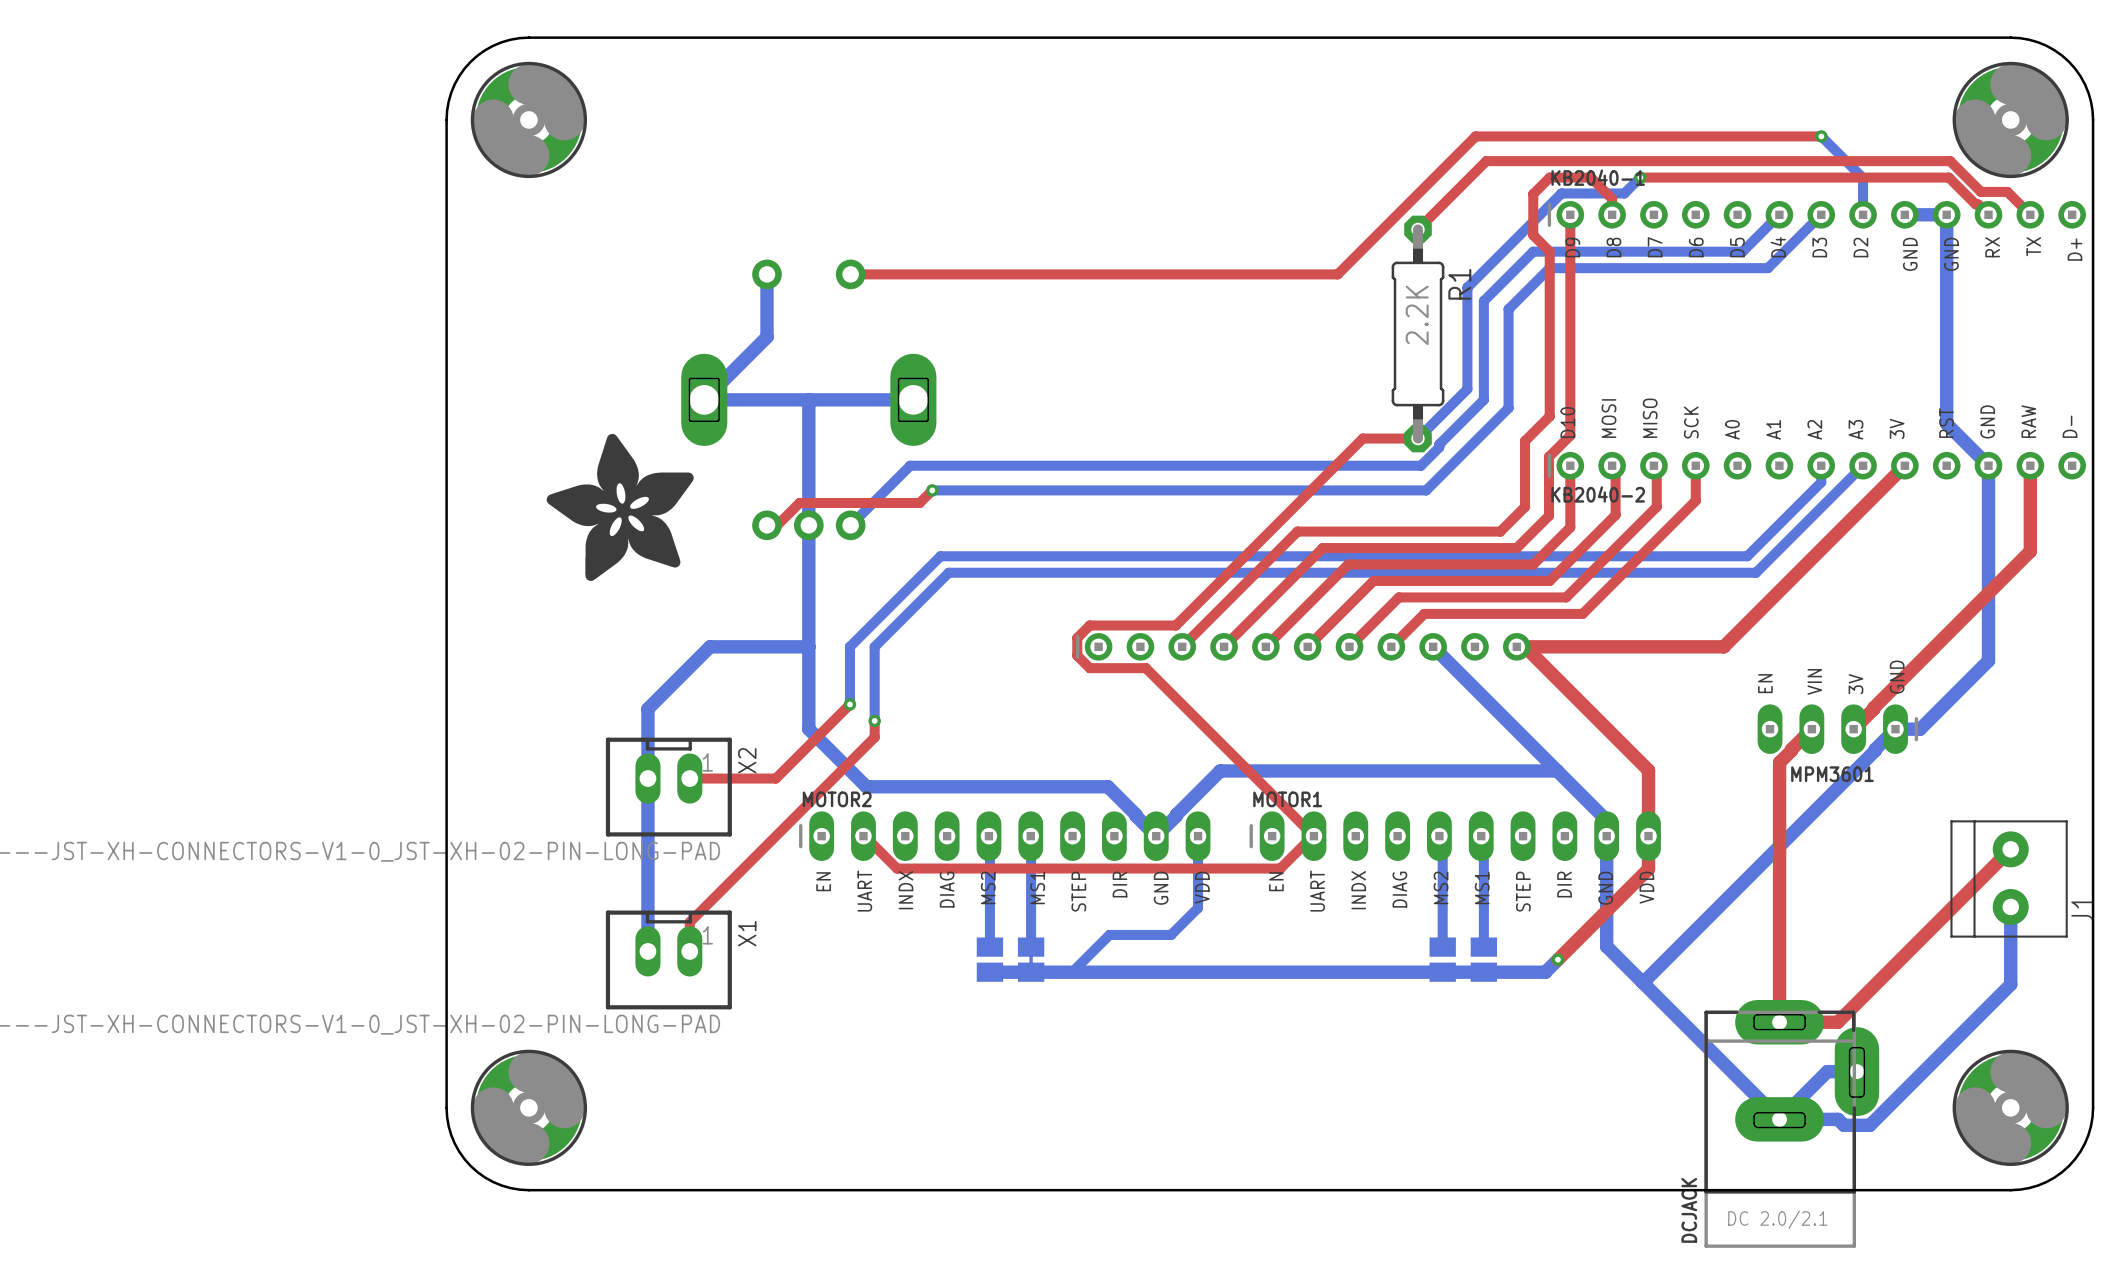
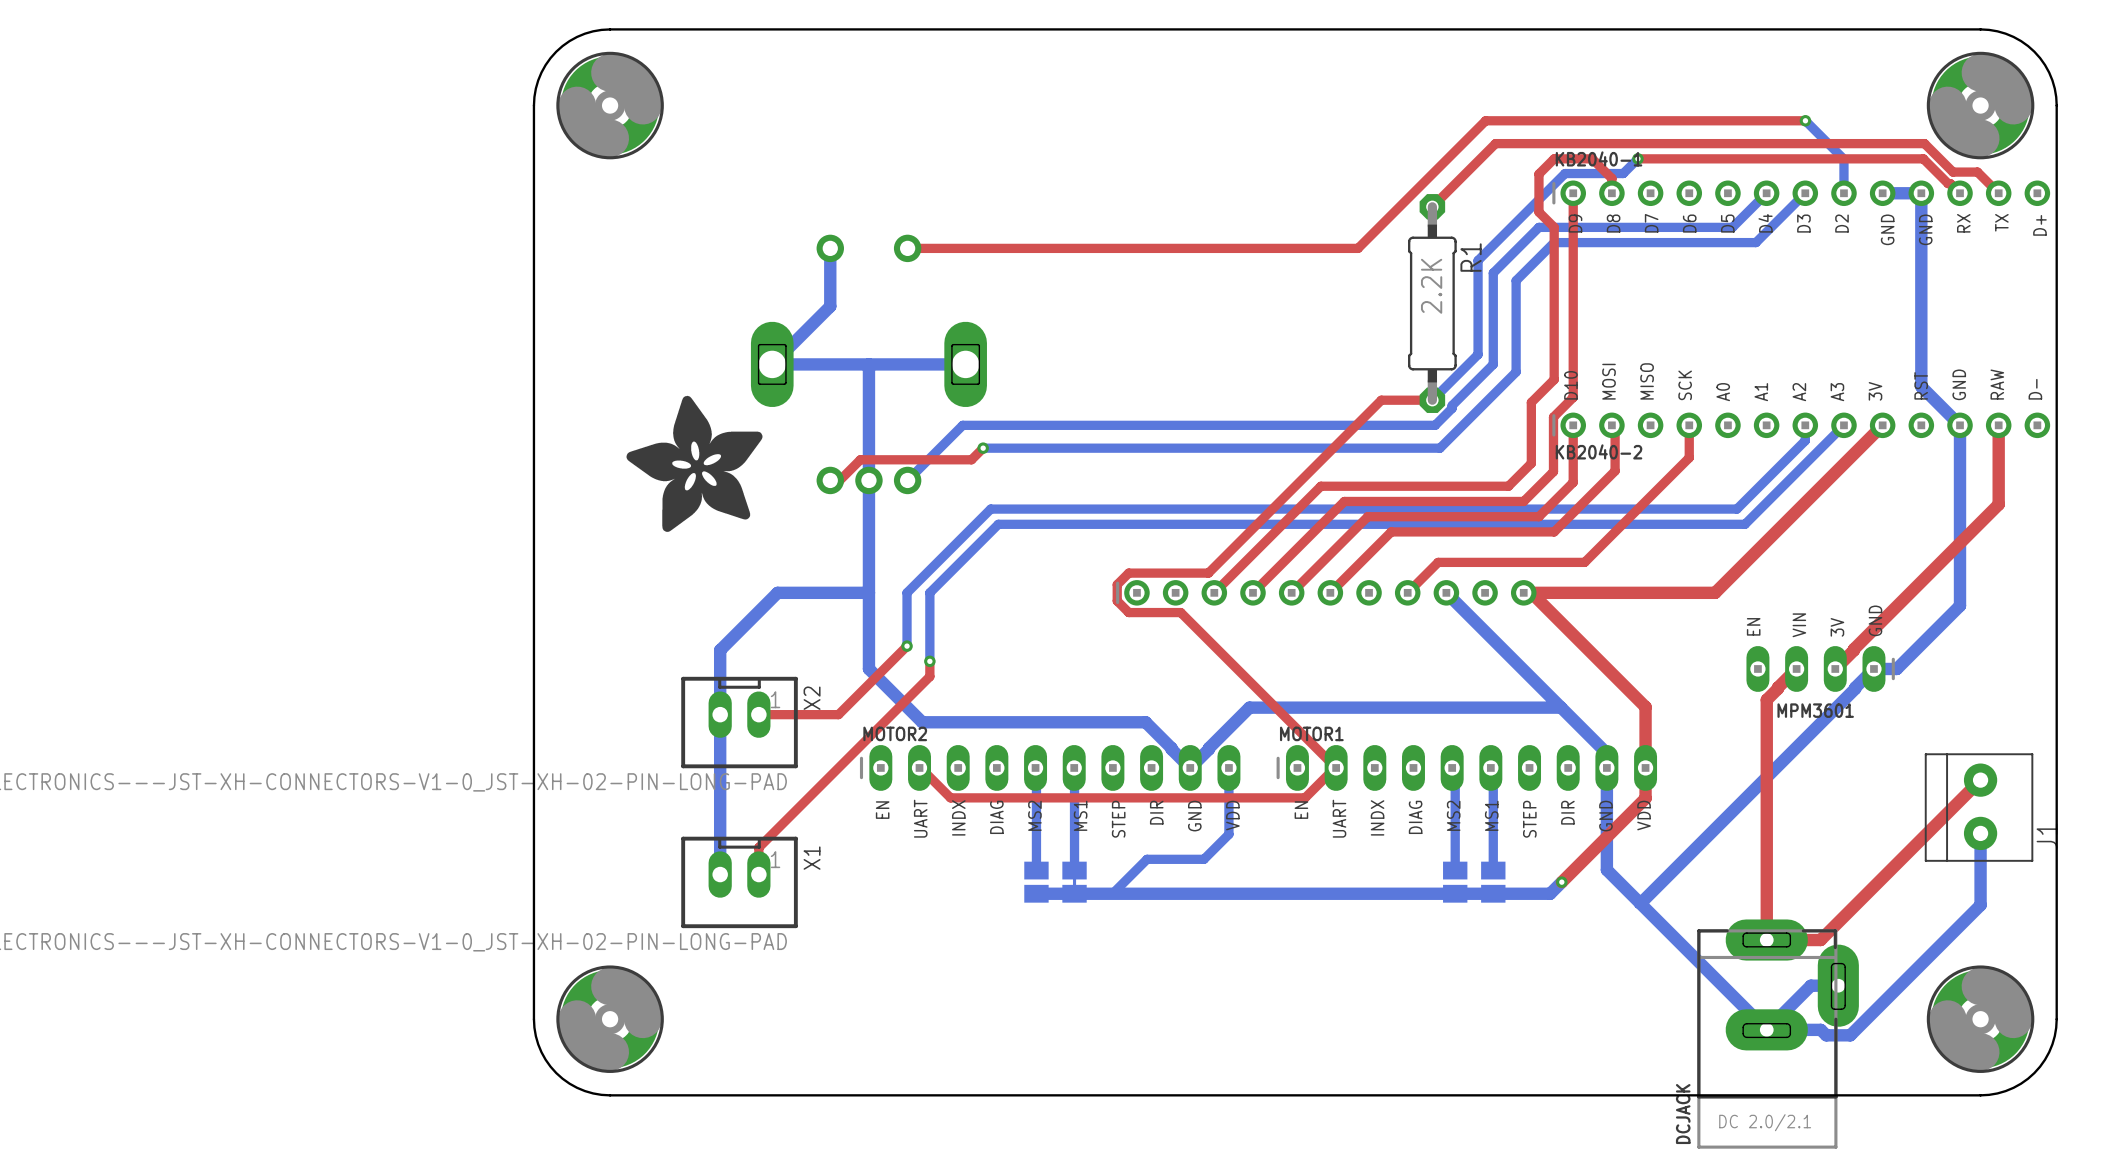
top track: (1653, 465) (1656, 468) (1656, 506) (1566, 597) (1398, 597) (1349, 646) -> none

